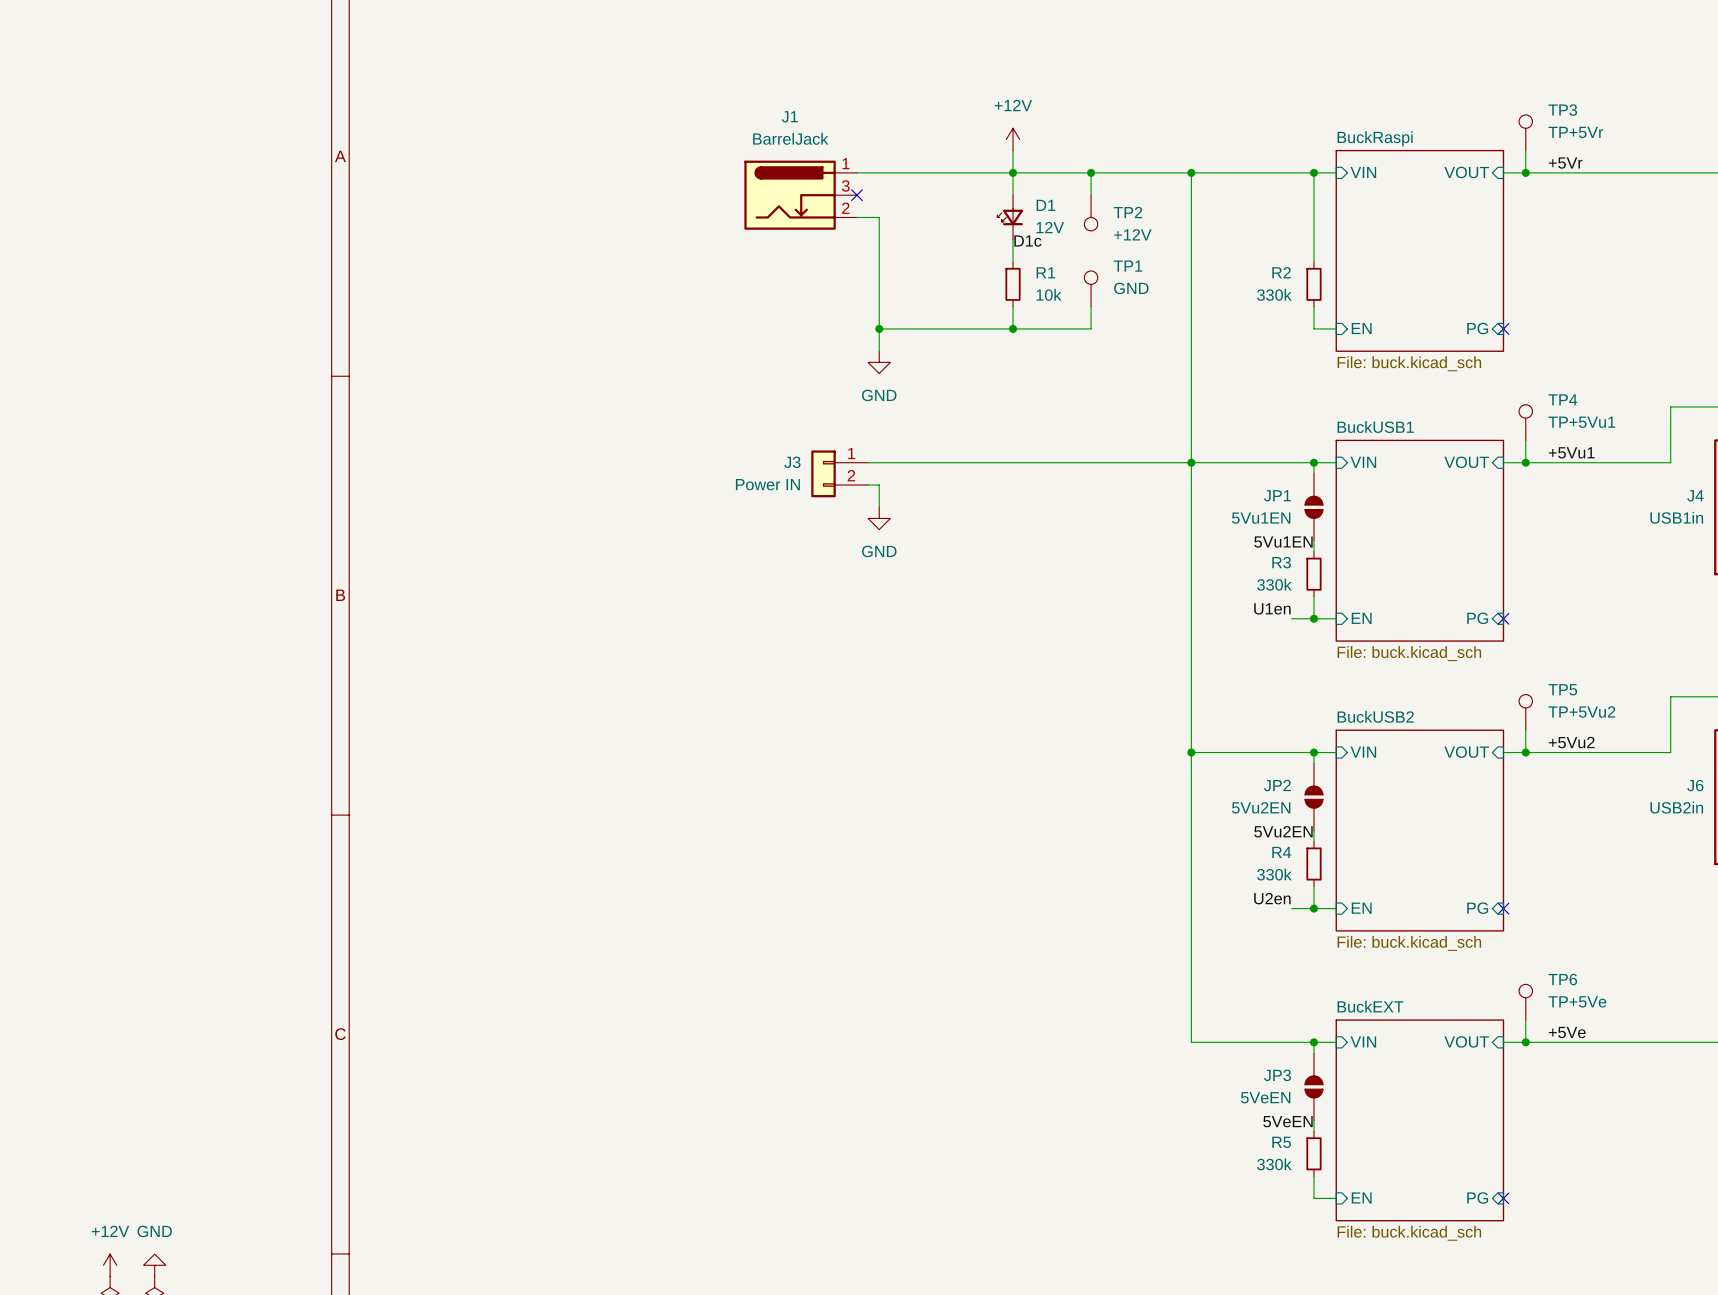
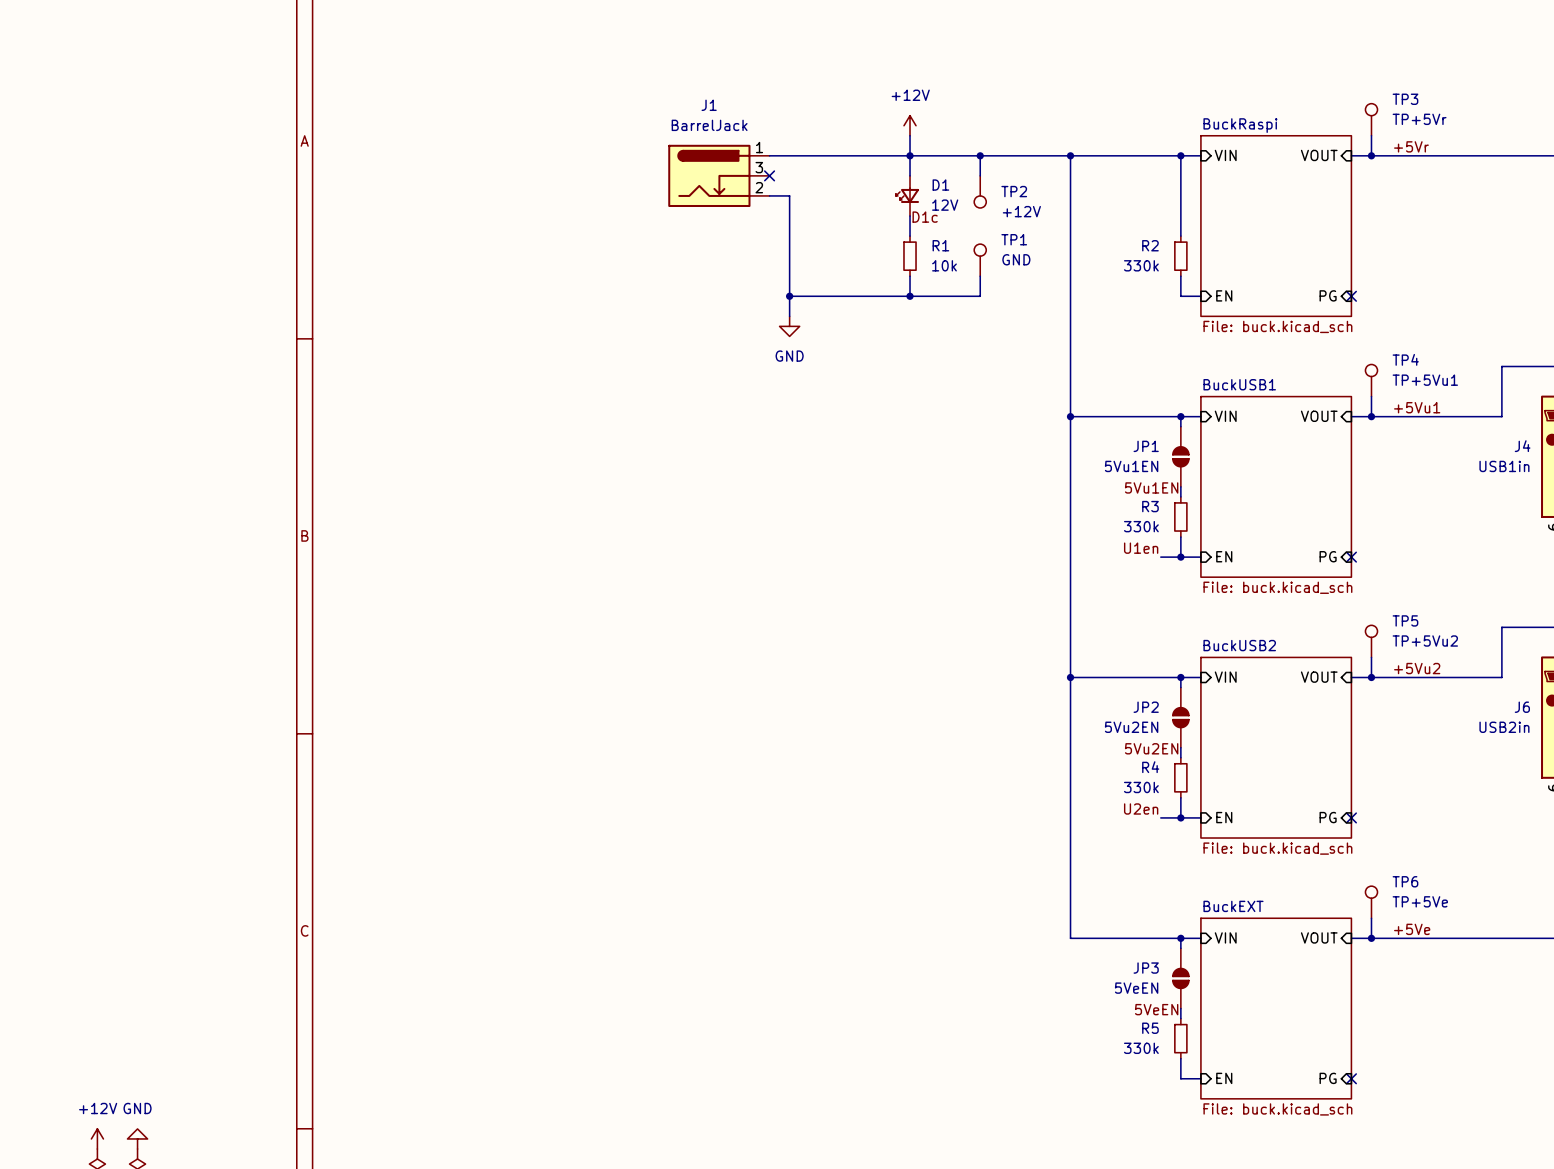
wire: (868, 462) (1191, 462) -> none
J3: Power IN (839, 473) -> none
wire: (868, 485) (879, 485) (879, 507) -> none
power symbol: GND (879, 518) -> none

